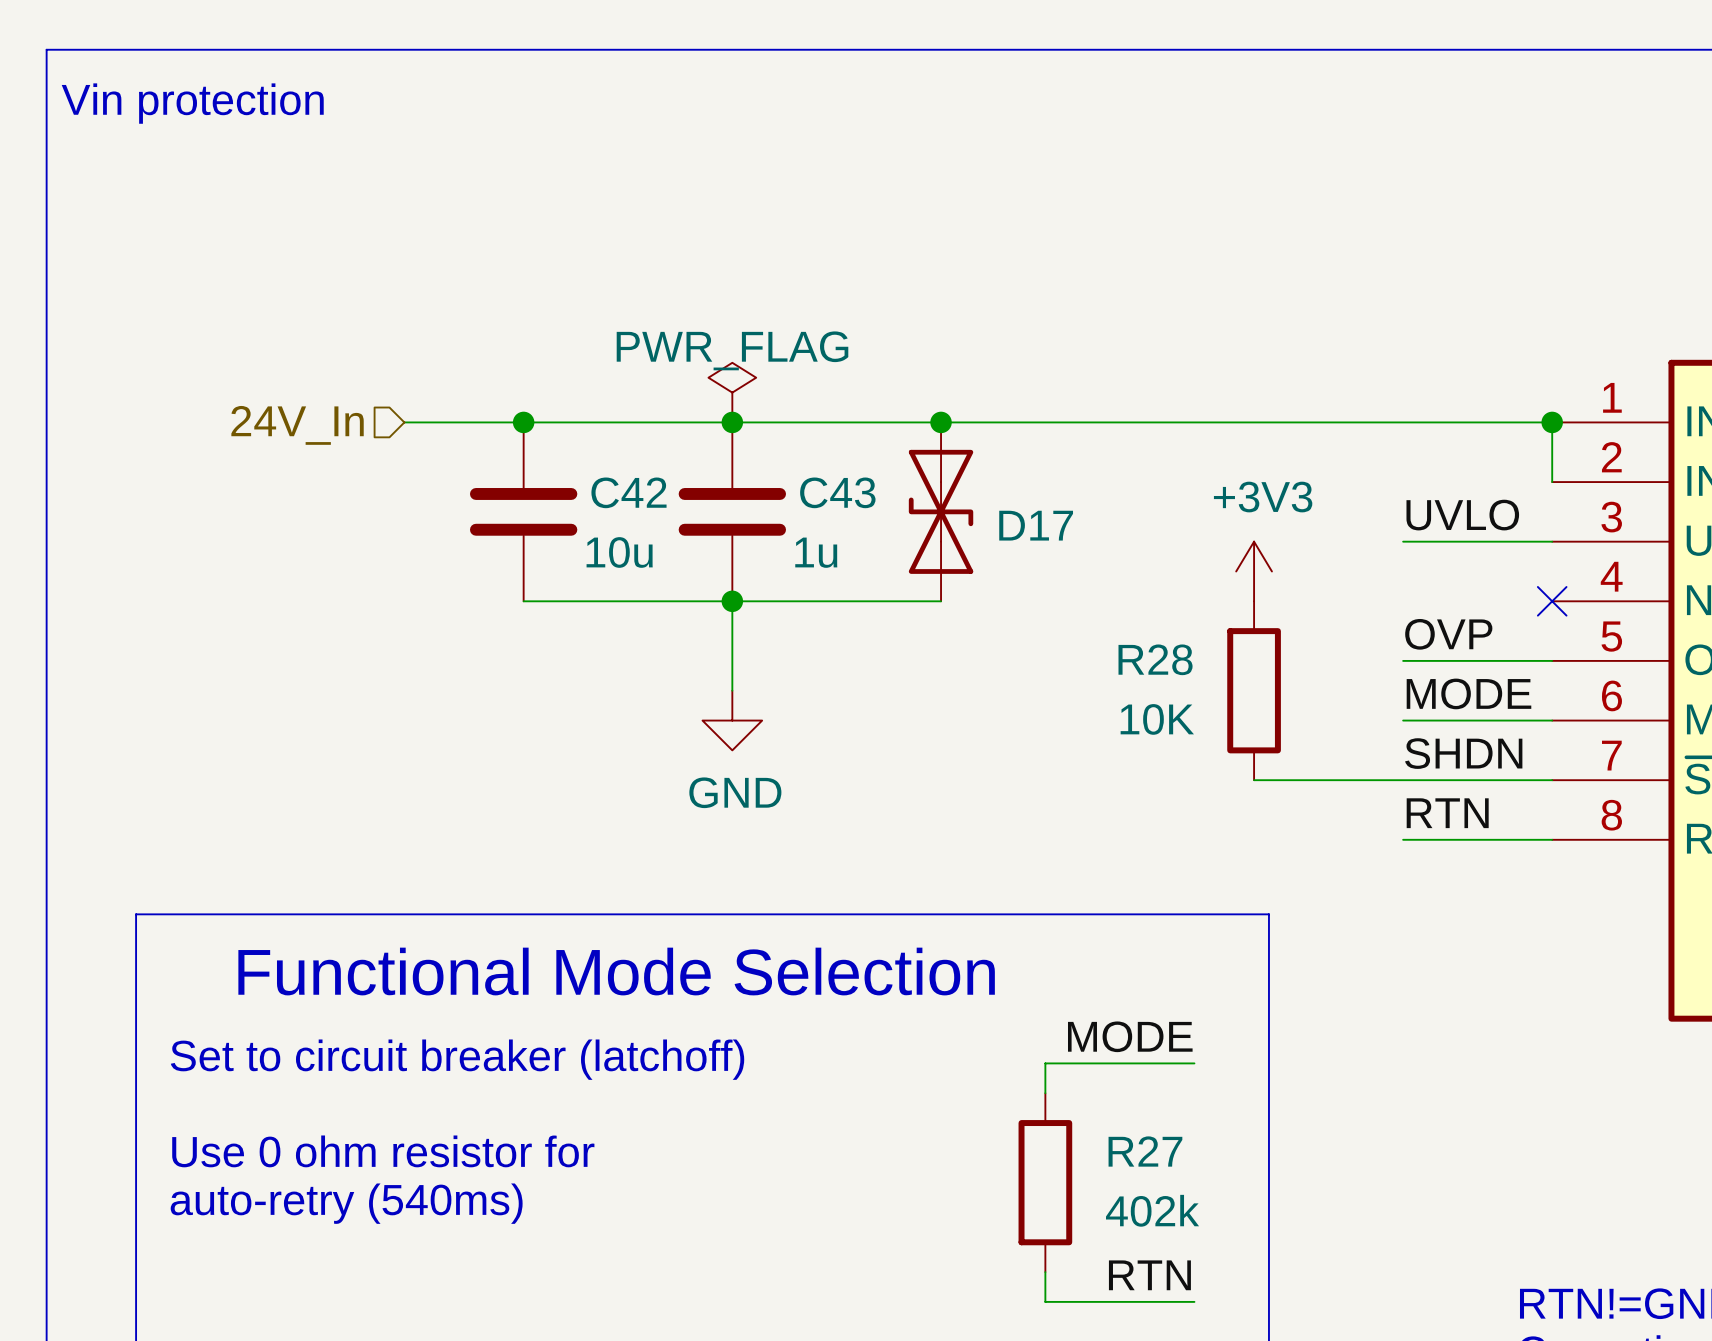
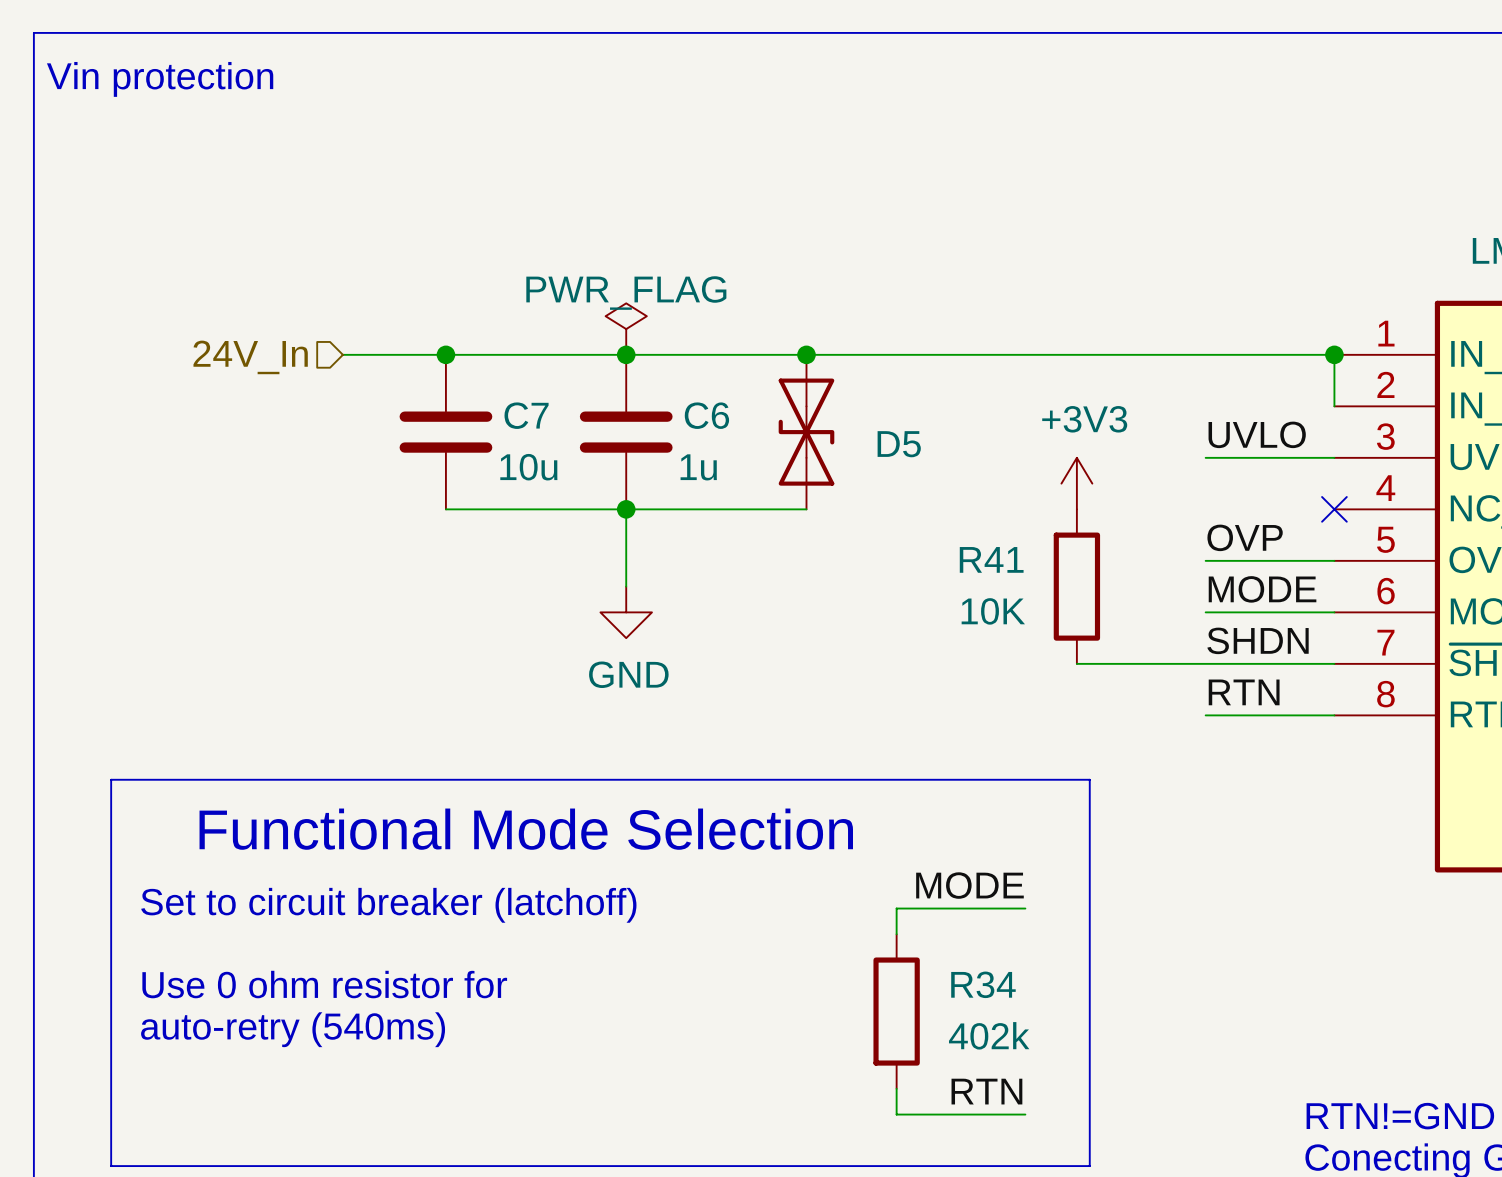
C42 name: C42 (628, 492) -> C7 (526, 415)
C43 name: C43 (837, 492) -> C6 (706, 415)
D17 name: D17 (1036, 525) -> D5 (899, 444)
R28 name: R28 (1155, 659) -> R41 (991, 559)
R27 name: R27 (1145, 1151) -> R34 (983, 984)

